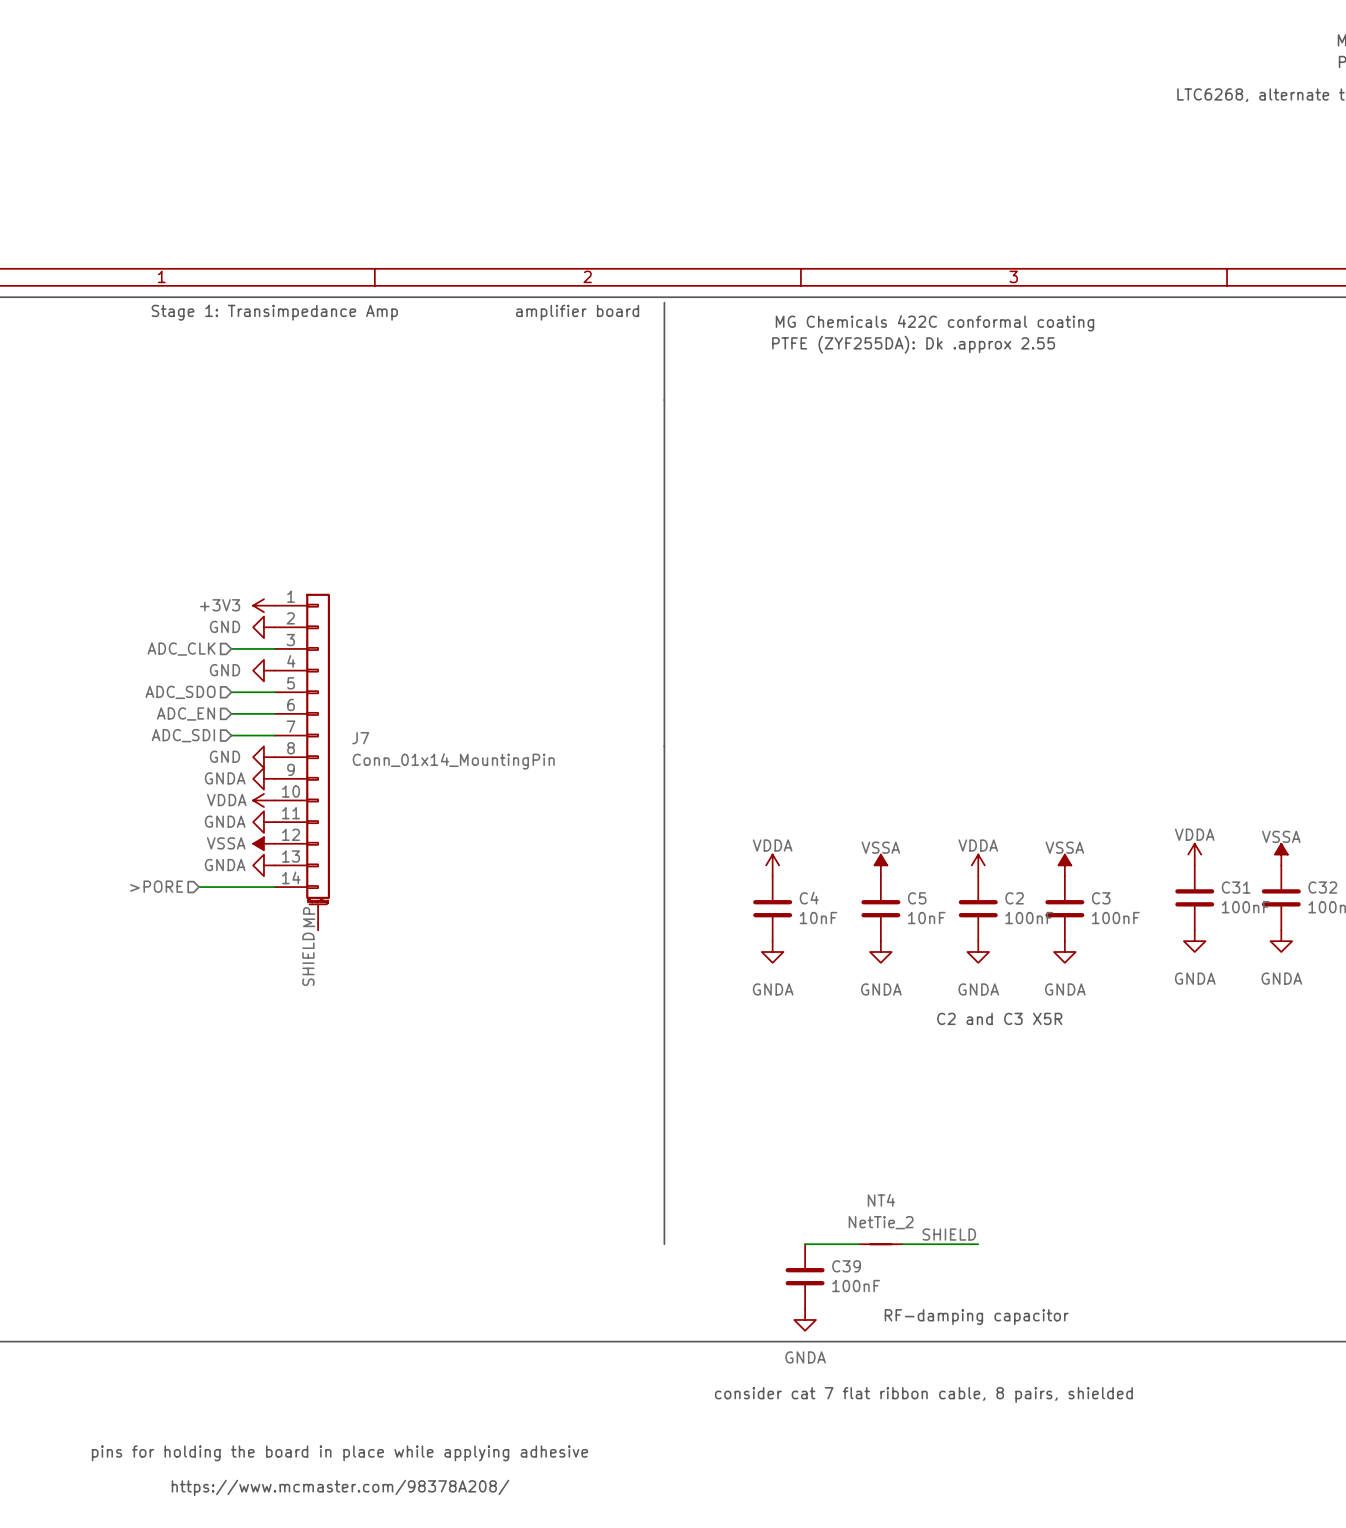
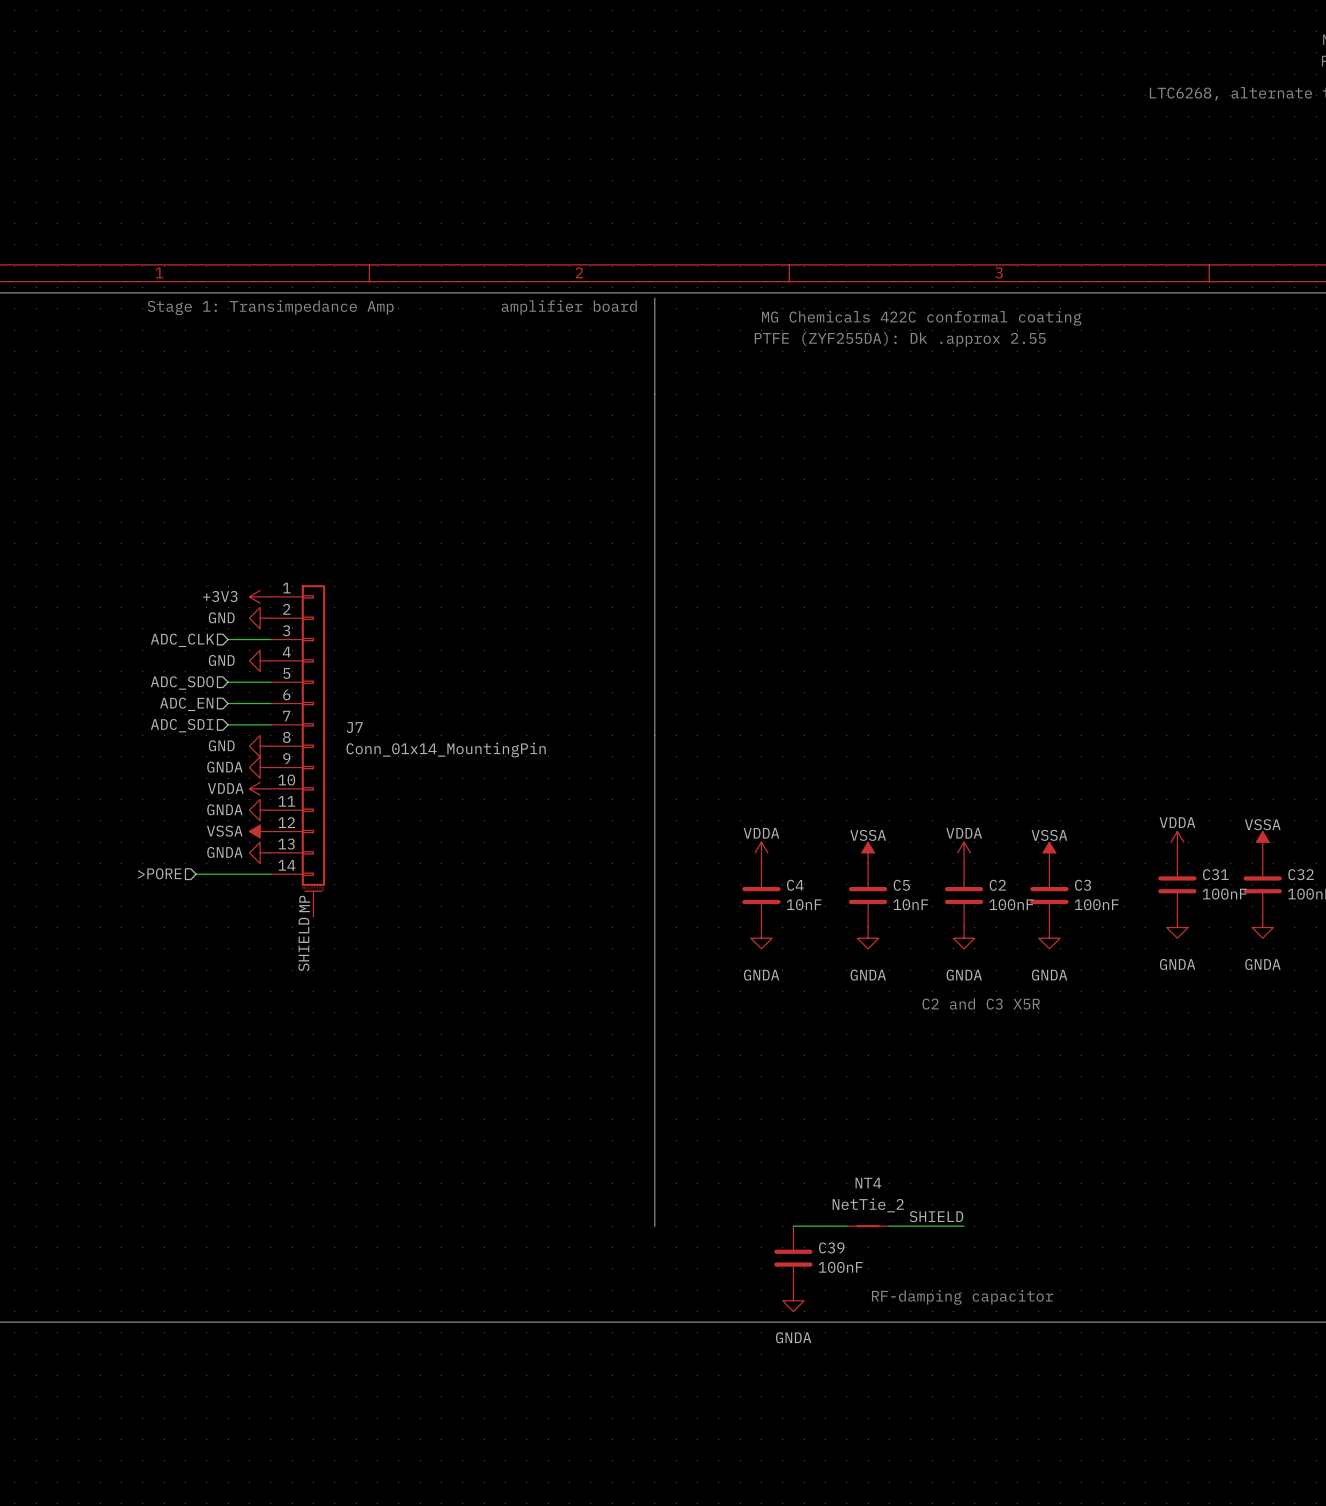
text: consider cat 7 flat ribbon cable, 8 pairs, shielded (923, 1395) -> none
text: pins for holding the board in place while applying adhesive (339, 1453) -> none
text: https://www.mcmaster.com/98378A208/ (340, 1487) -> none

